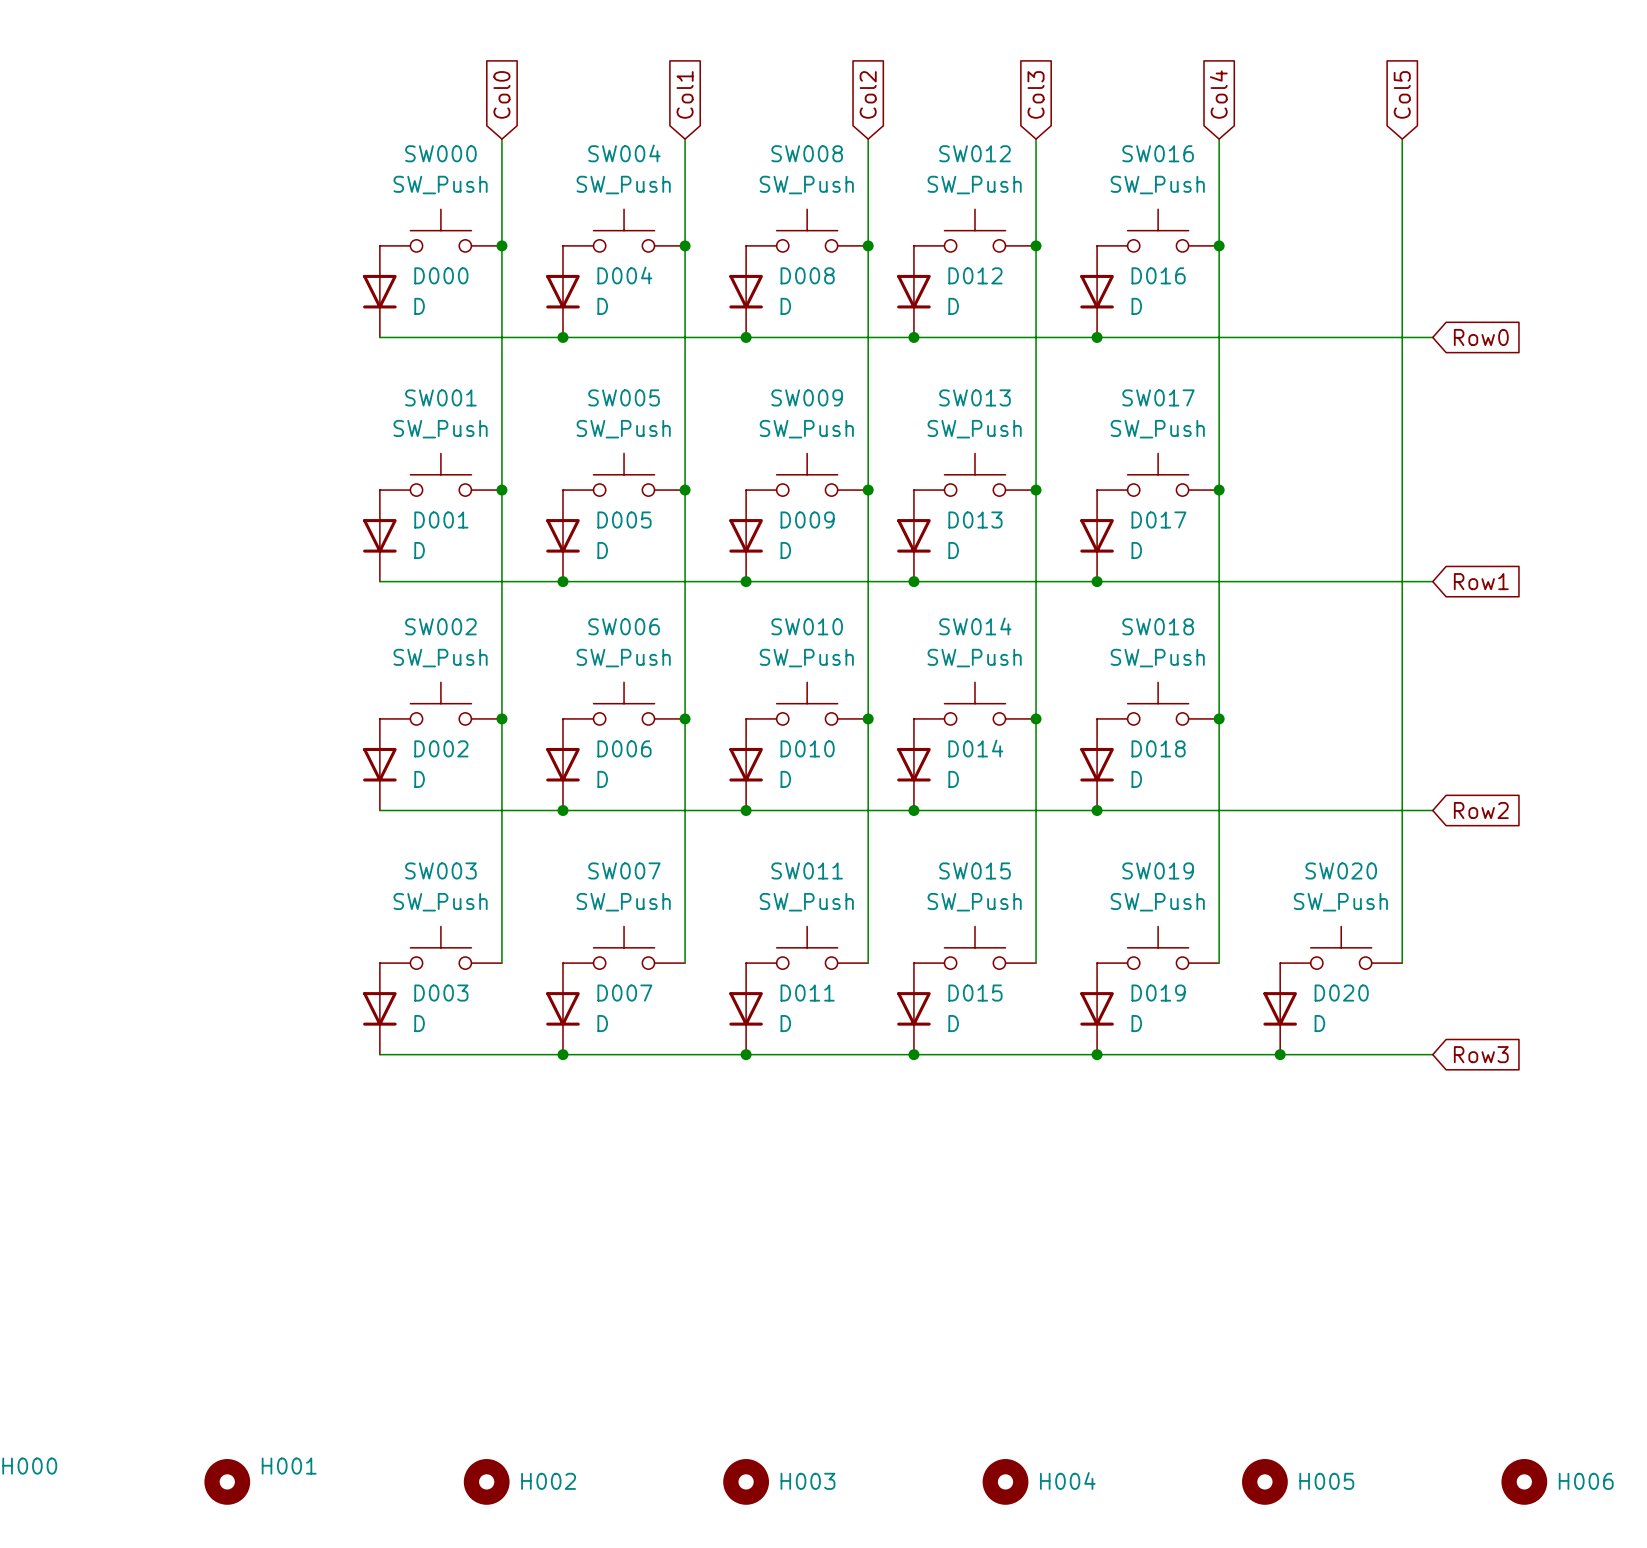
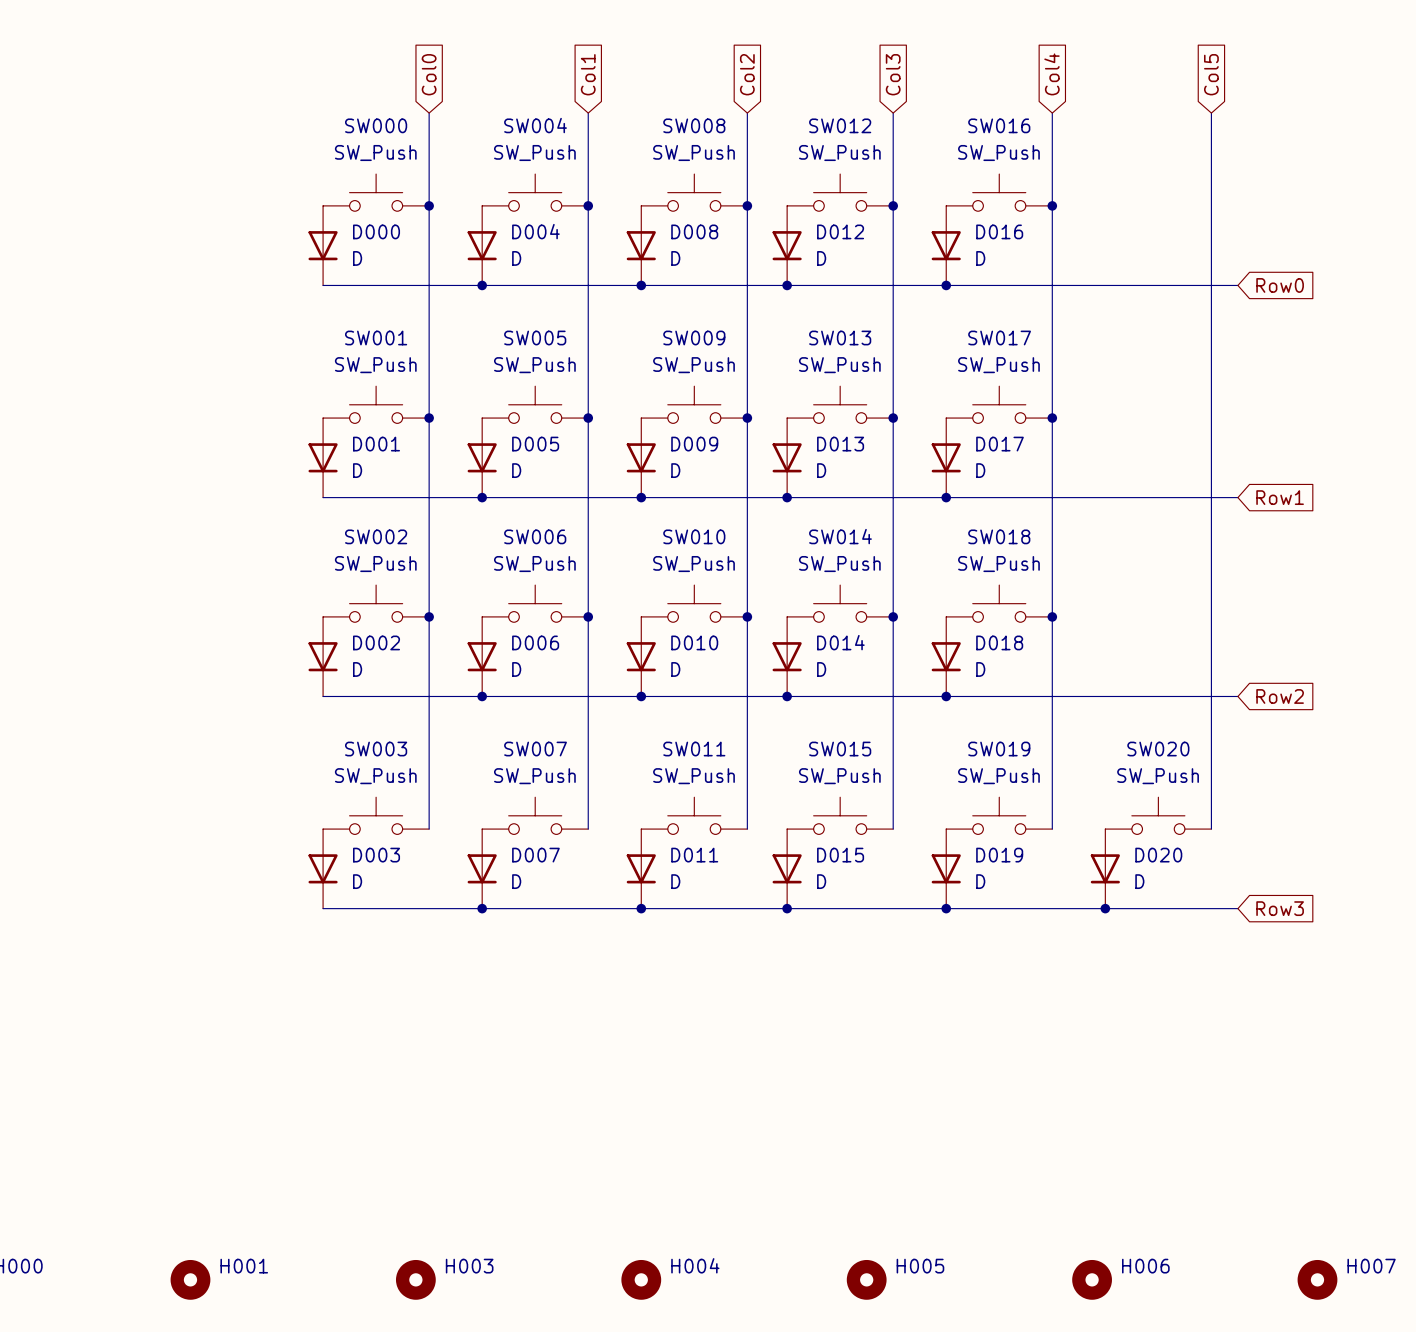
H004 name: H004 (1067, 1480) -> H005 (920, 1266)
H002 name: H002 (548, 1481) -> H003 (469, 1266)
H003 name: H003 (807, 1481) -> H004 (695, 1265)
H005 name: H005 (1326, 1481) -> H006 (1145, 1266)
H006 name: H006 (1586, 1481) -> H007 (1371, 1266)

